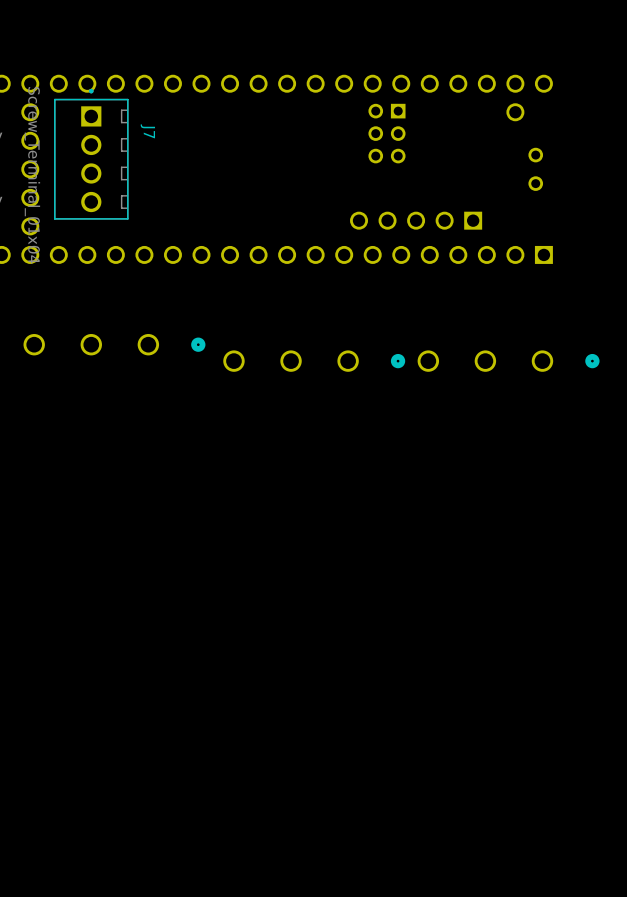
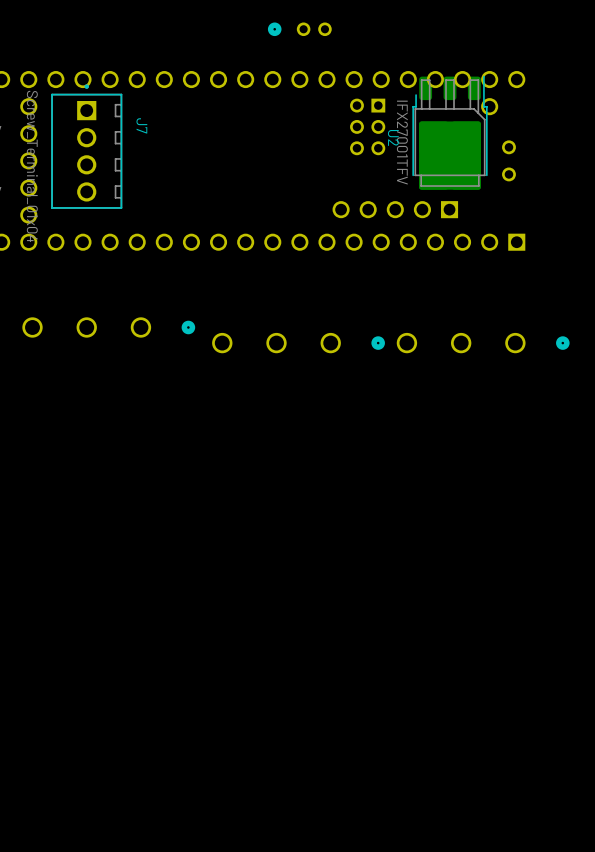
part: none -> (299, 29)
U2: none -> IFX27001TFV (450, 132)

